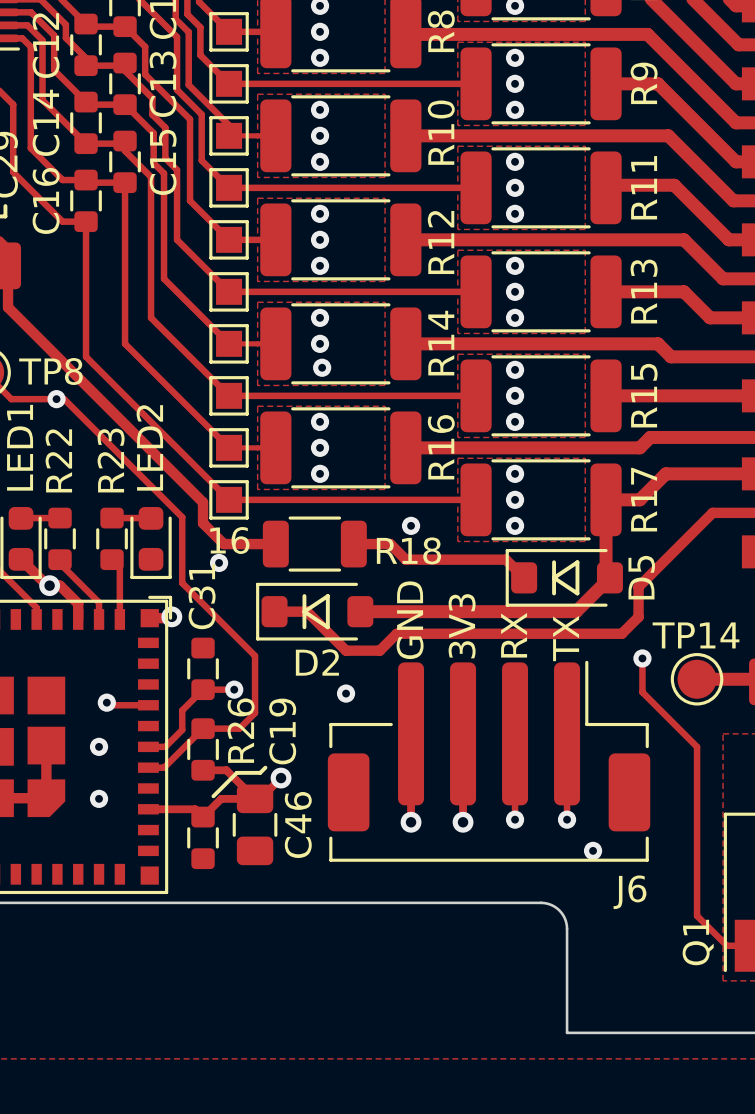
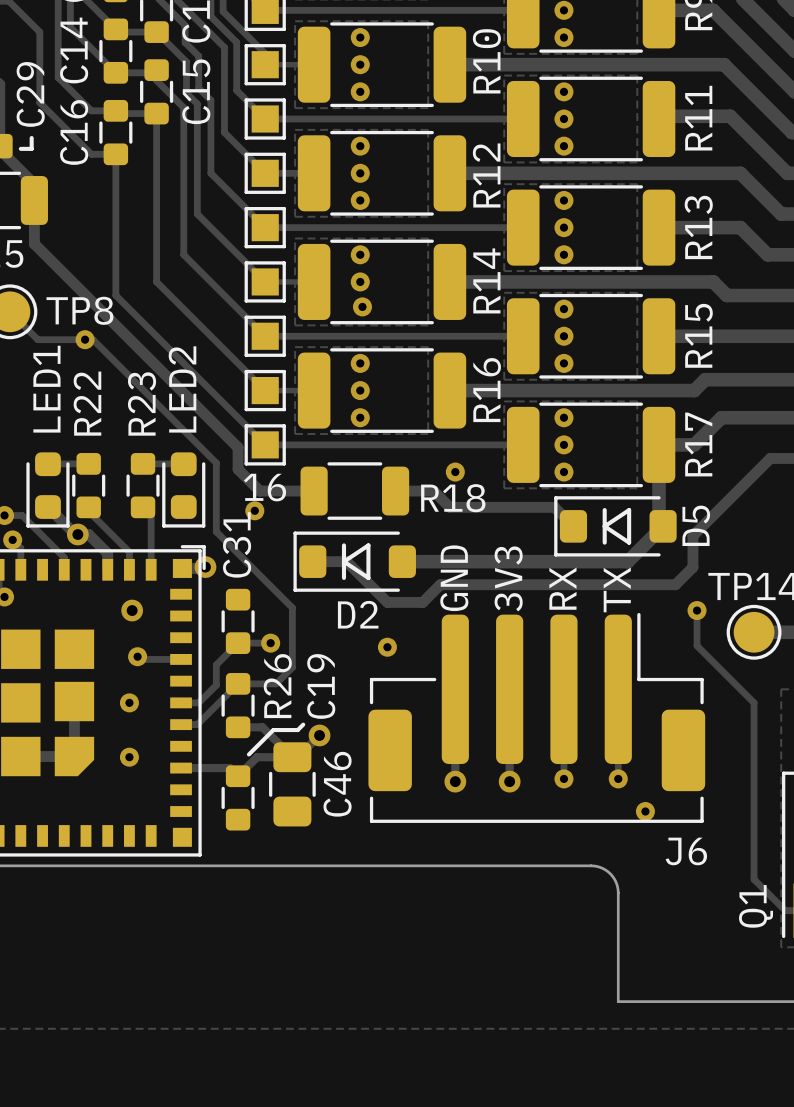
via: none -> (132, 610)

